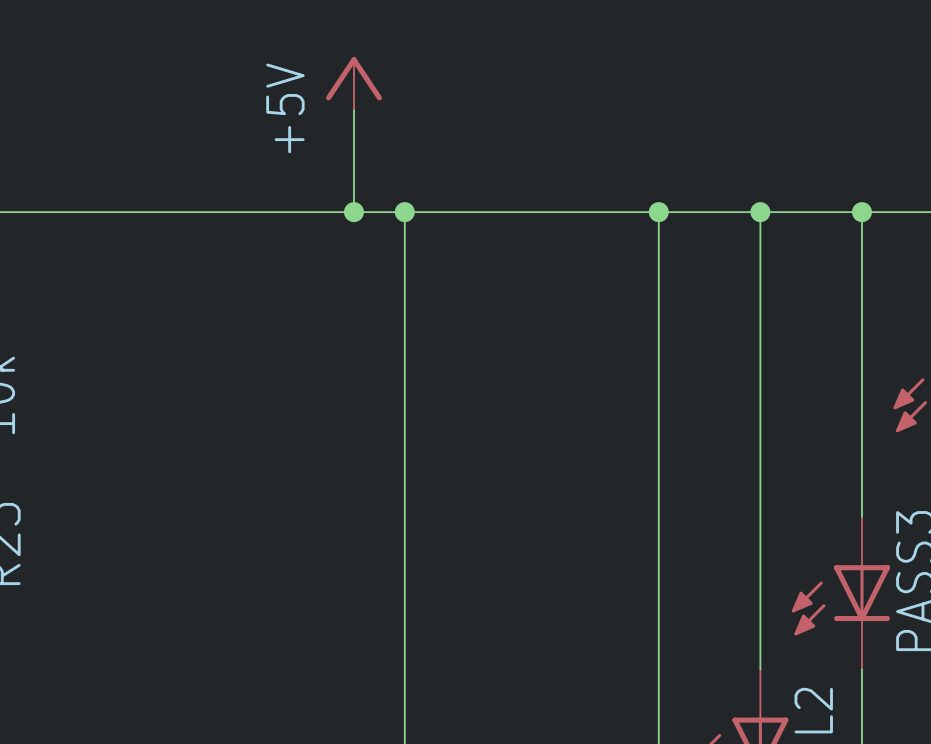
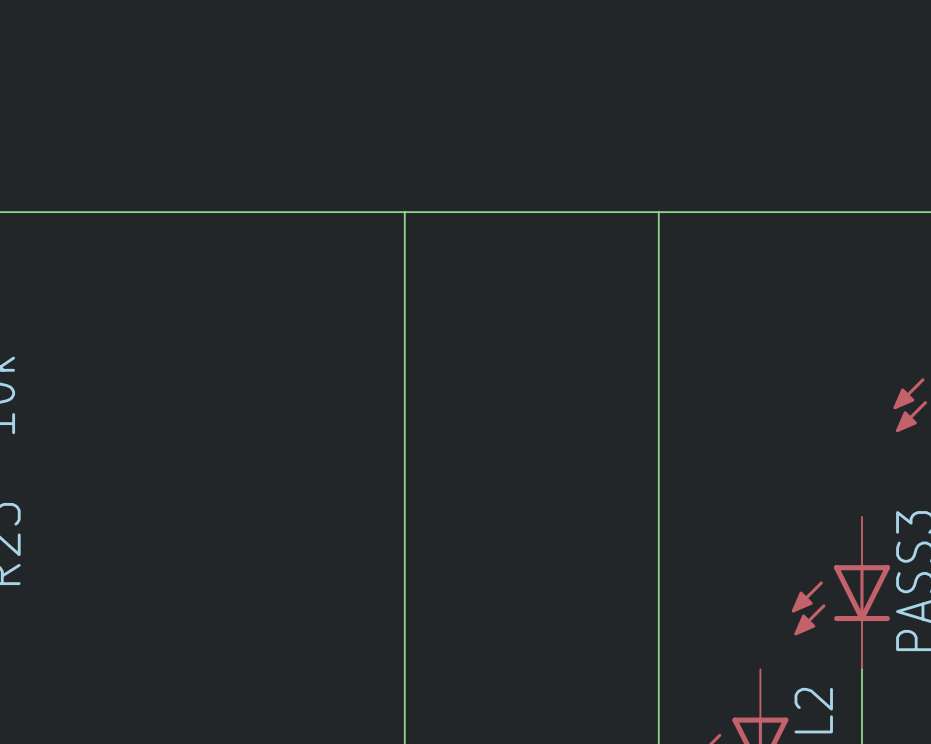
power symbol: +5V (353, 83) -> none
wire: (353, 110) (353, 212) -> none
junction: (353, 212) -> none
junction: (404, 212) -> none
junction: (658, 212) -> none
wire: (760, 212) (760, 669) -> none
junction: (760, 212) -> none
wire: (861, 212) (861, 516) -> none
junction: (861, 212) -> none

